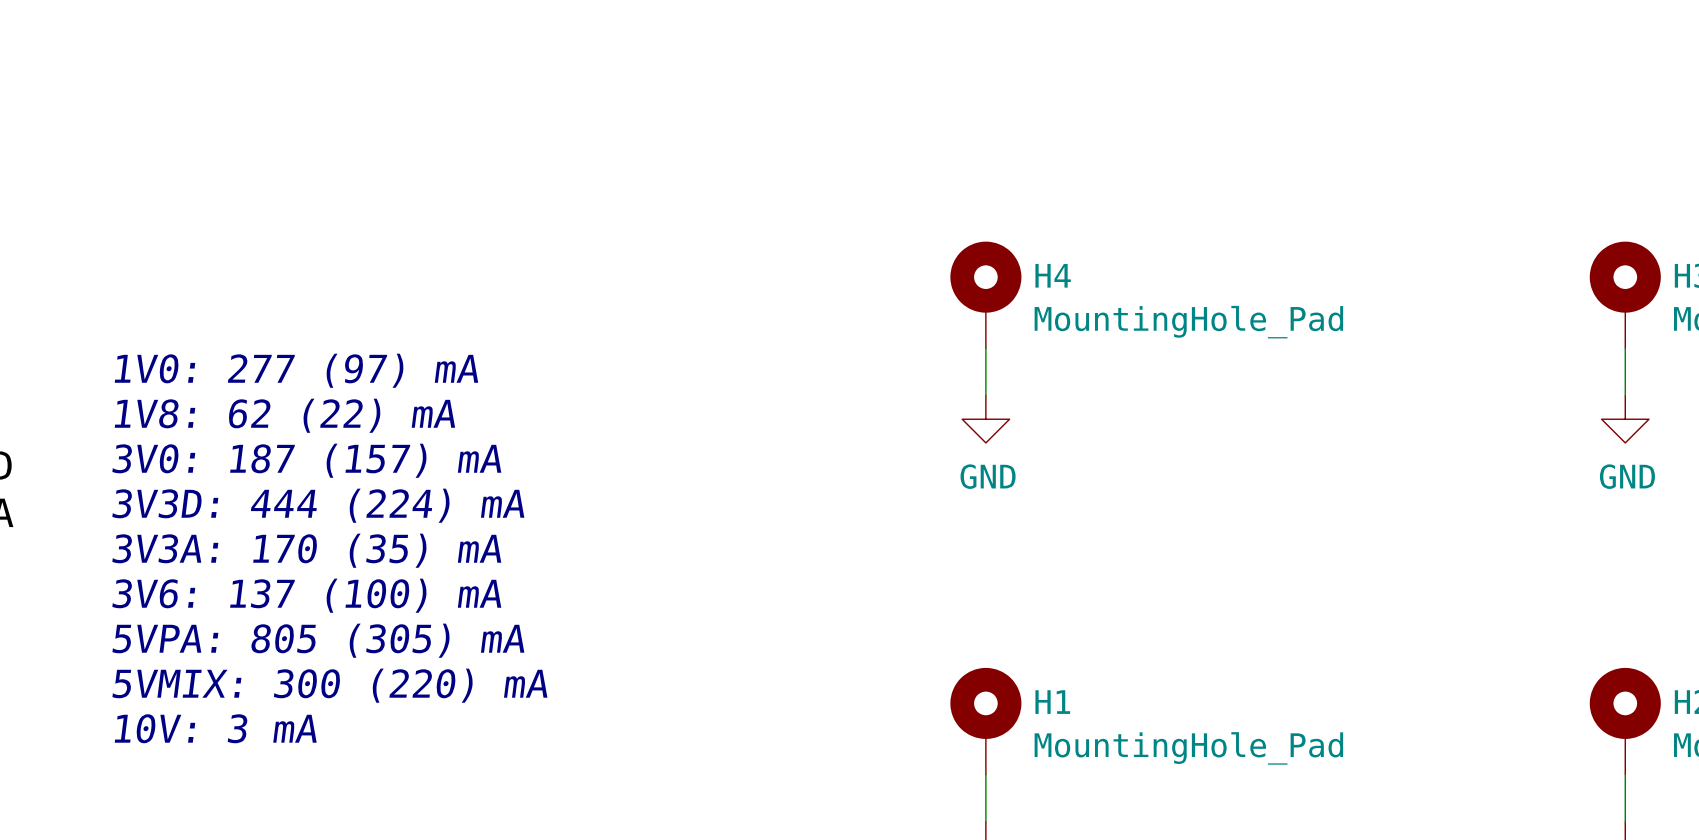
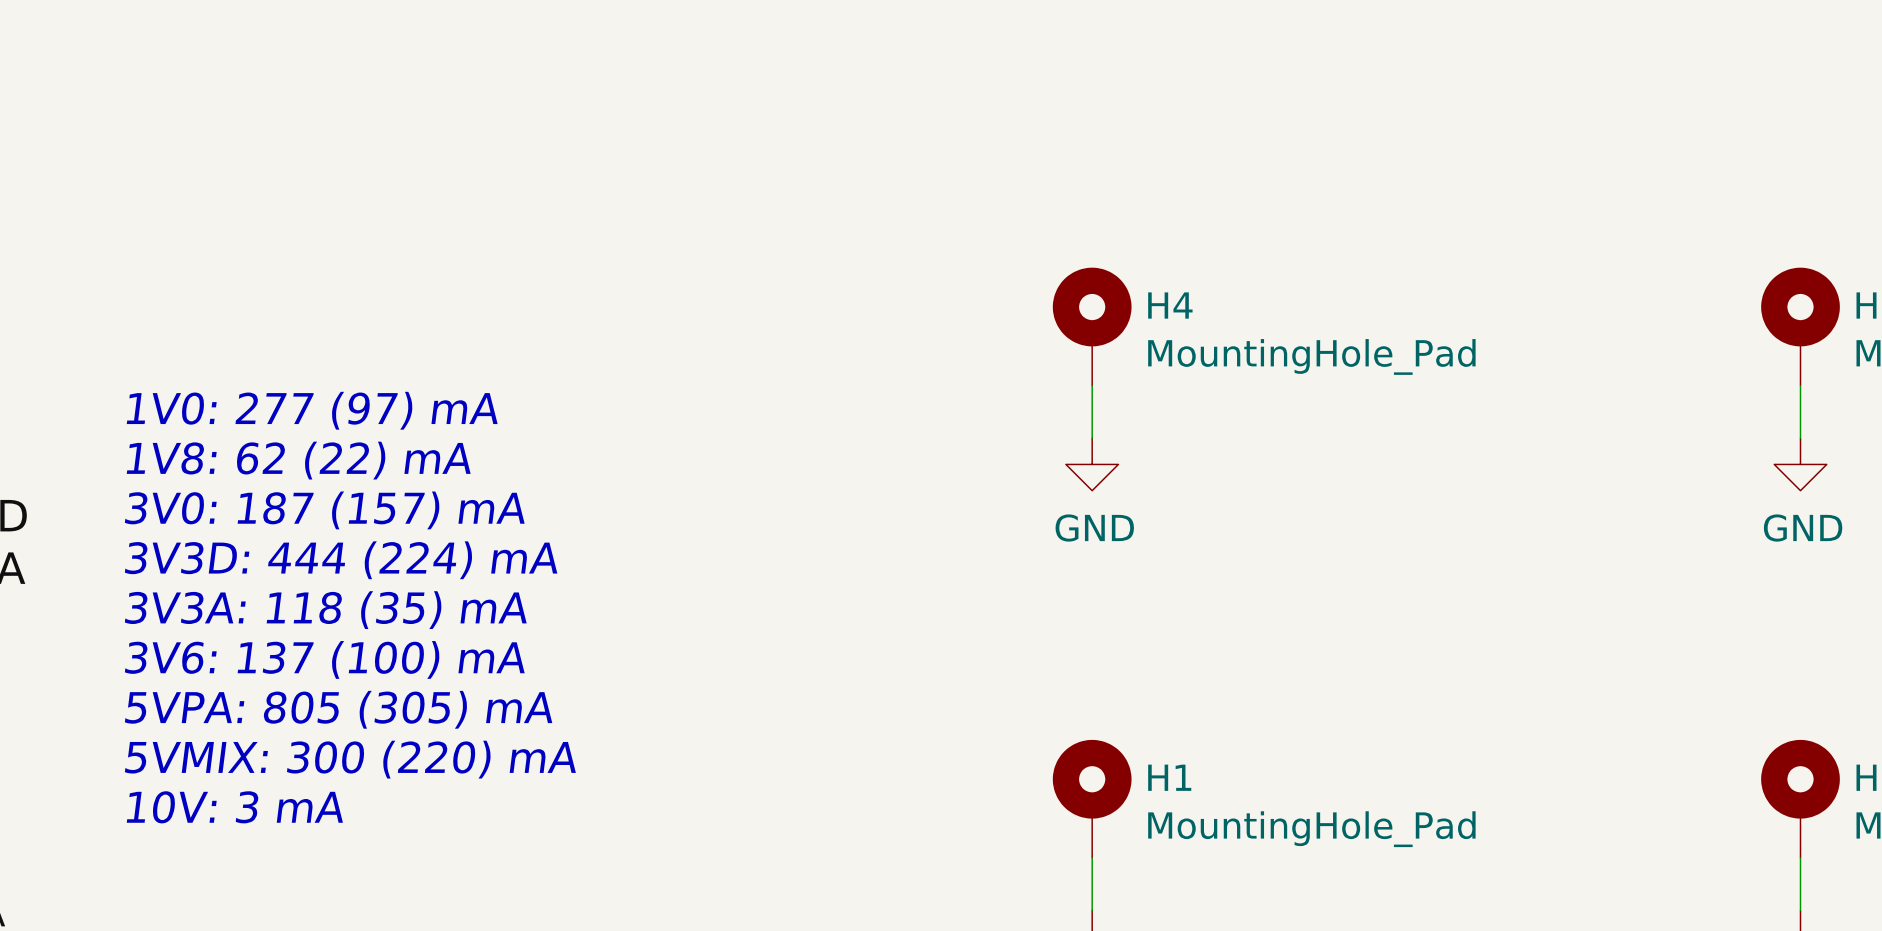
text: 3V3A: 170 (35) mA (306, 550) -> 3V3A: 118 (35) mA (325, 610)

